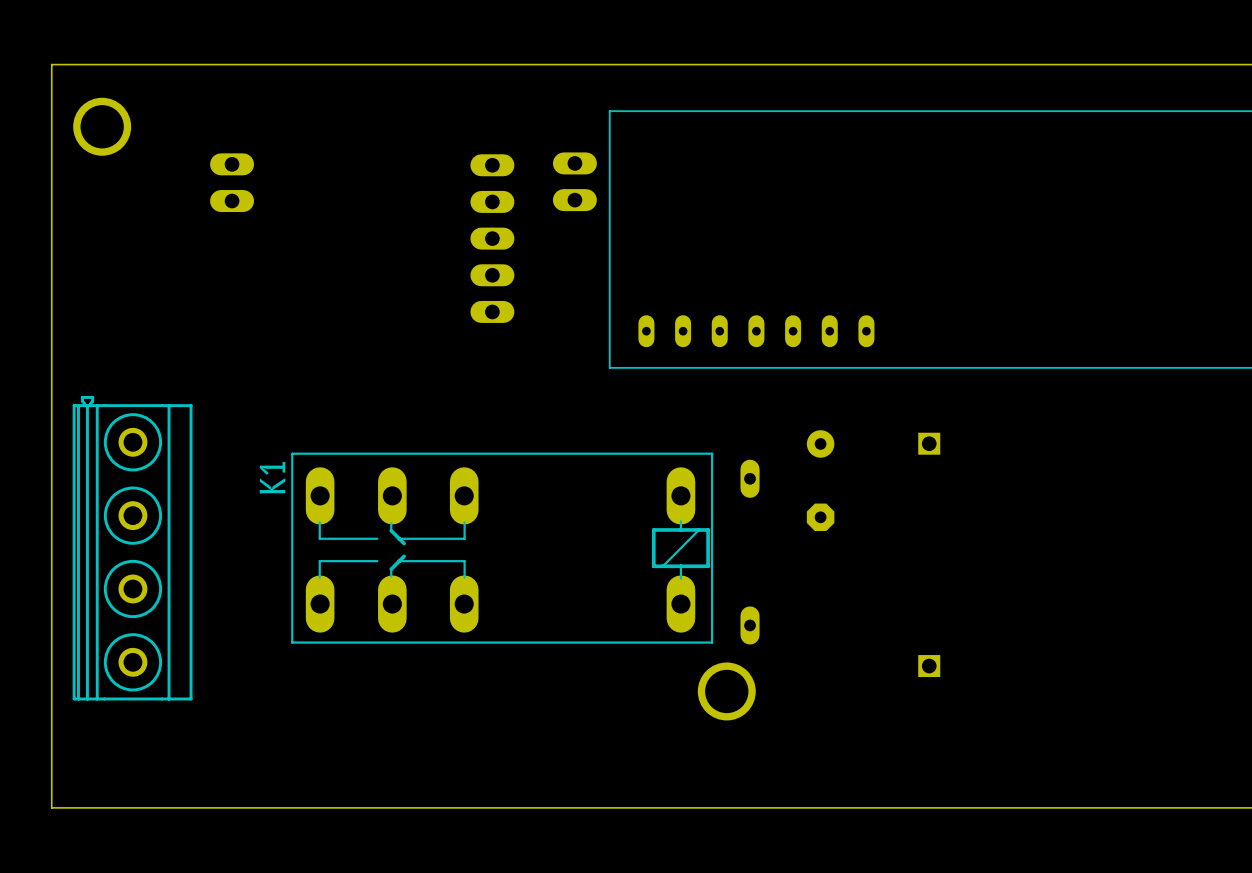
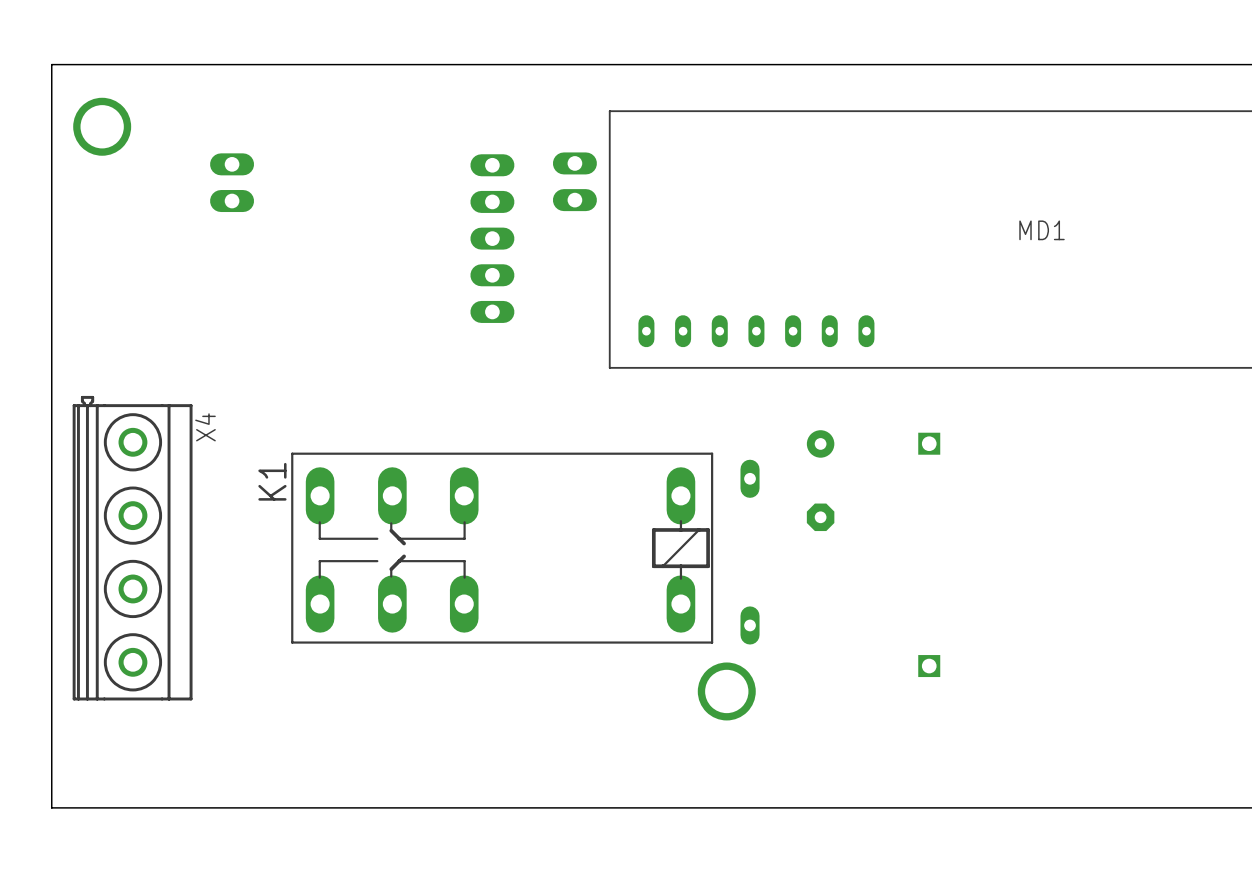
MD1 name: none -> MD1 (1042, 230)
X4 name: none -> X4 (205, 427)

